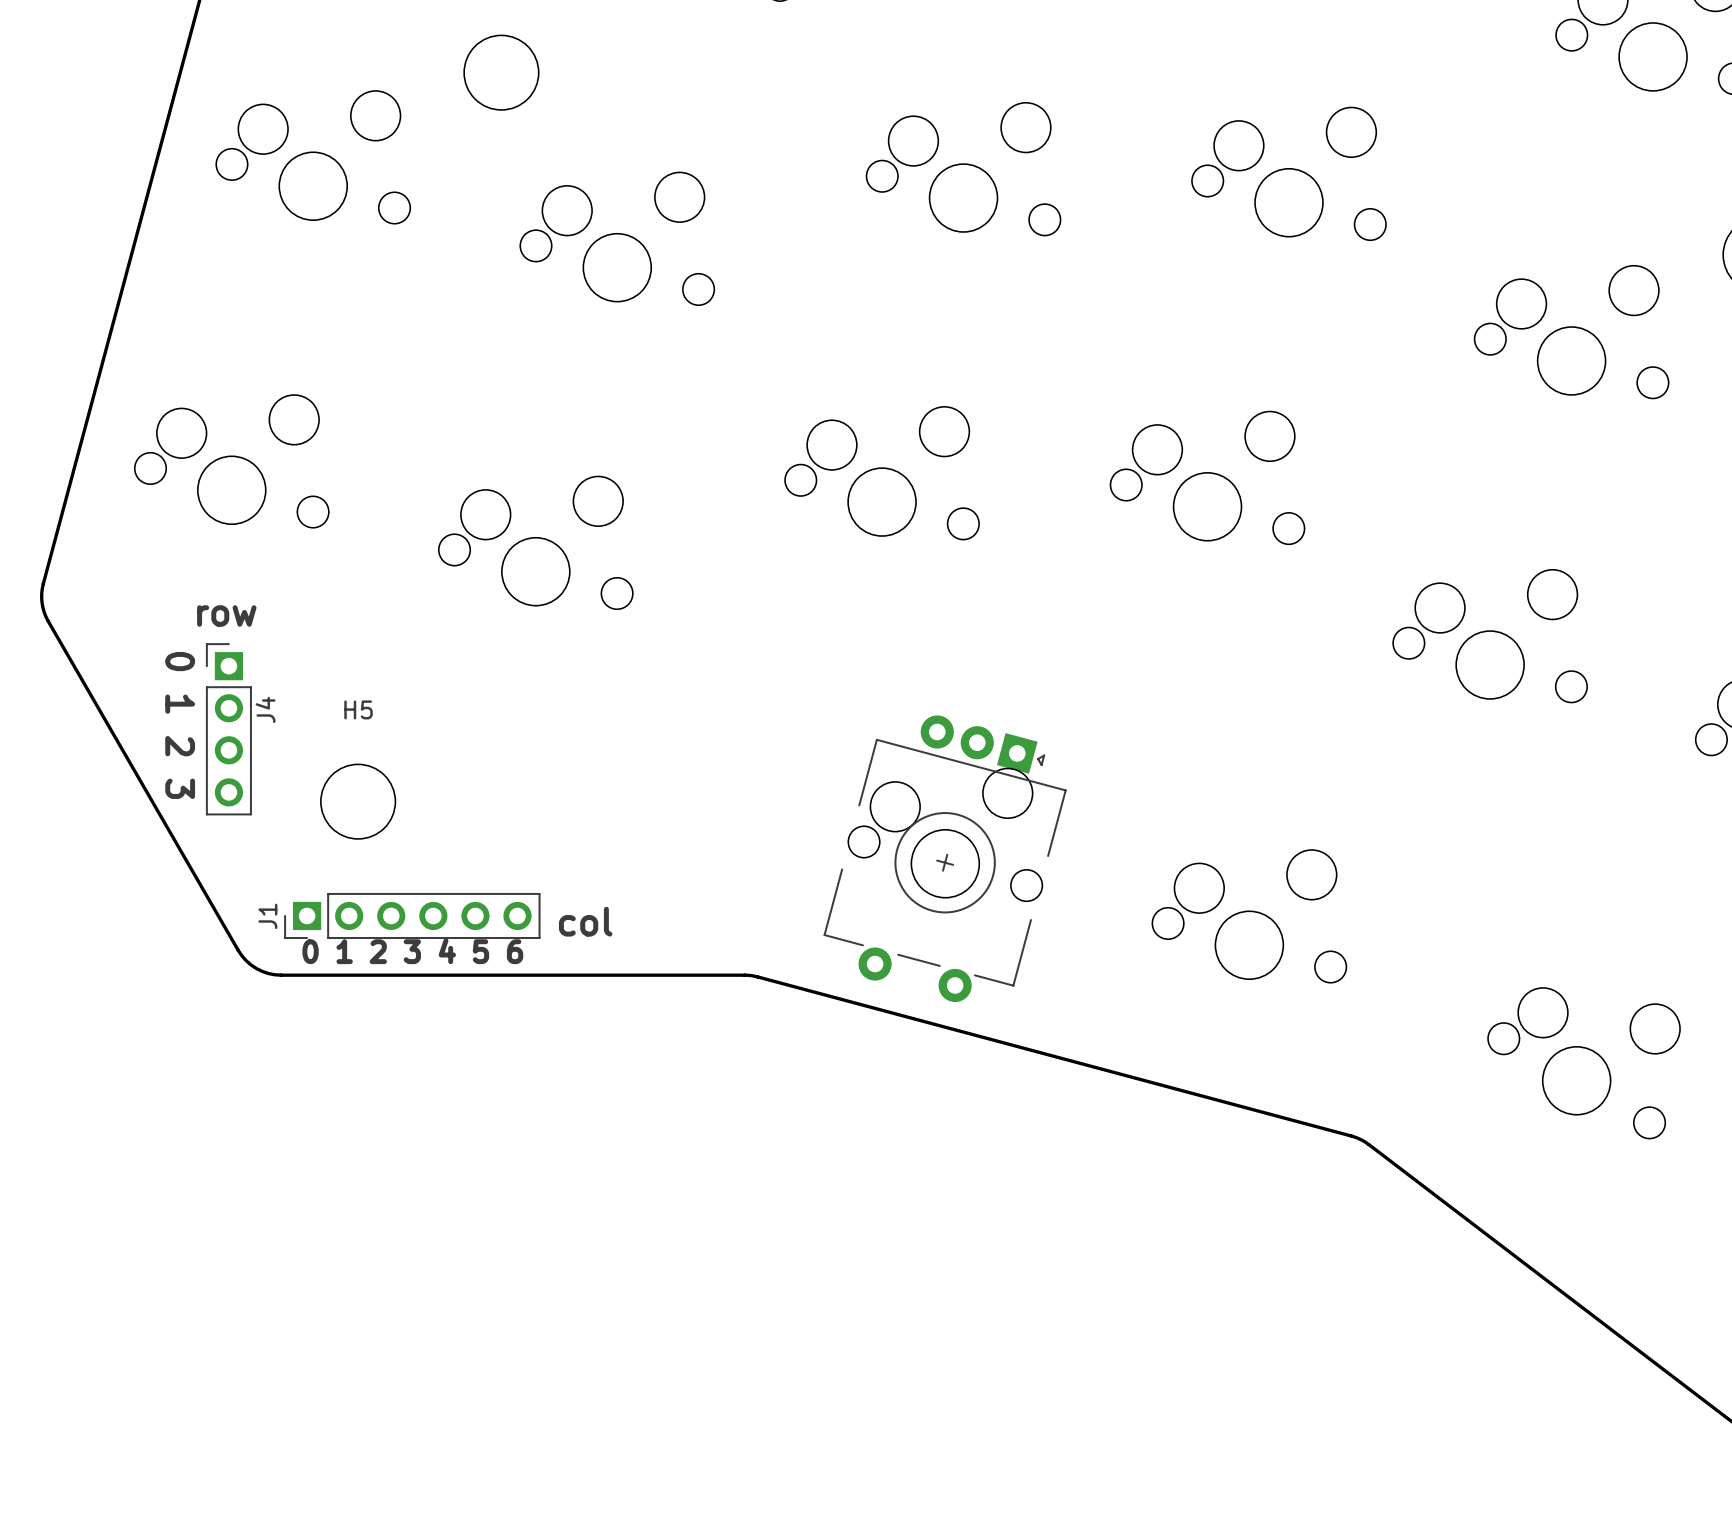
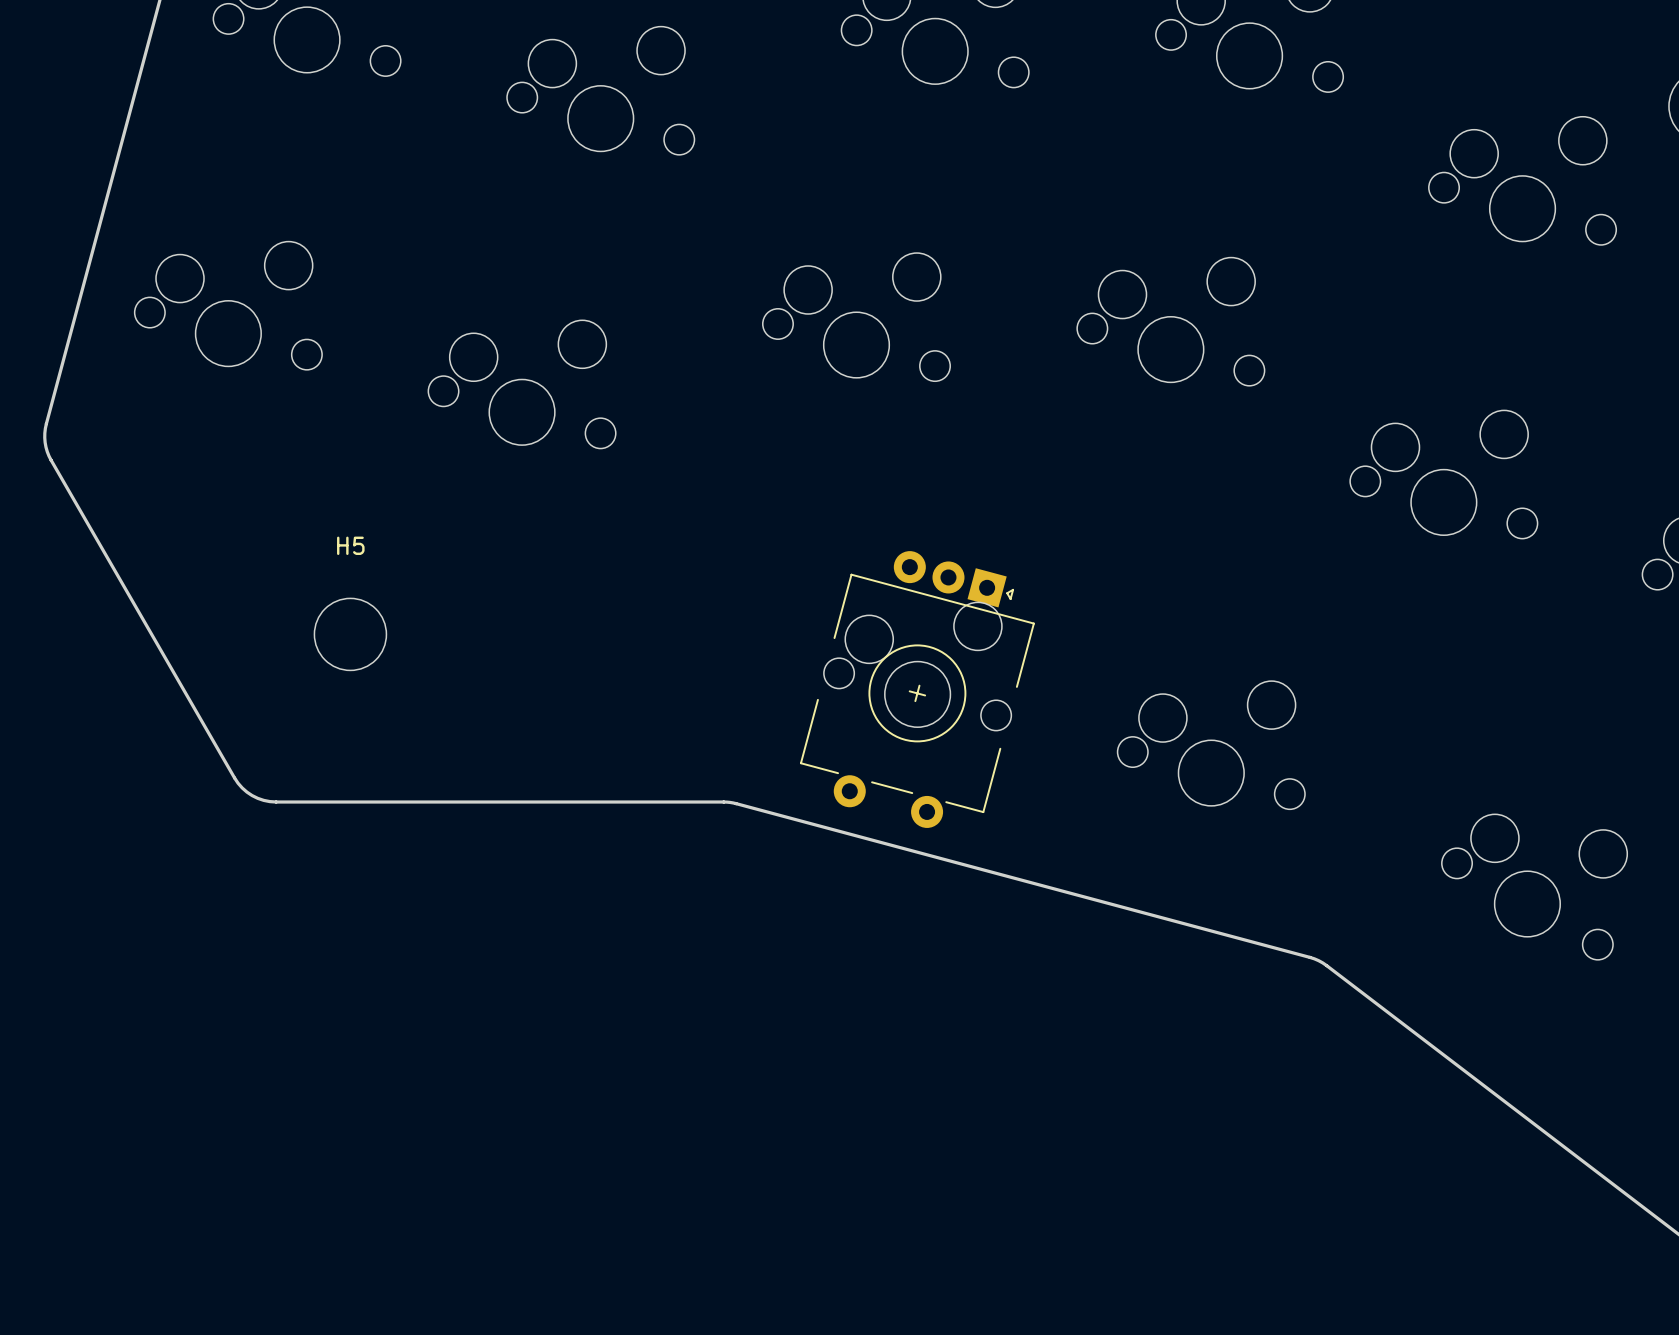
text: row (226, 616) -> none
text: 0 1 2 3 (180, 725) -> none
J4: (228, 729) -> none
J1: (412, 915) -> none
text: col (585, 921) -> none
text: 0 1 2 3 4 5 6 (412, 951) -> none

